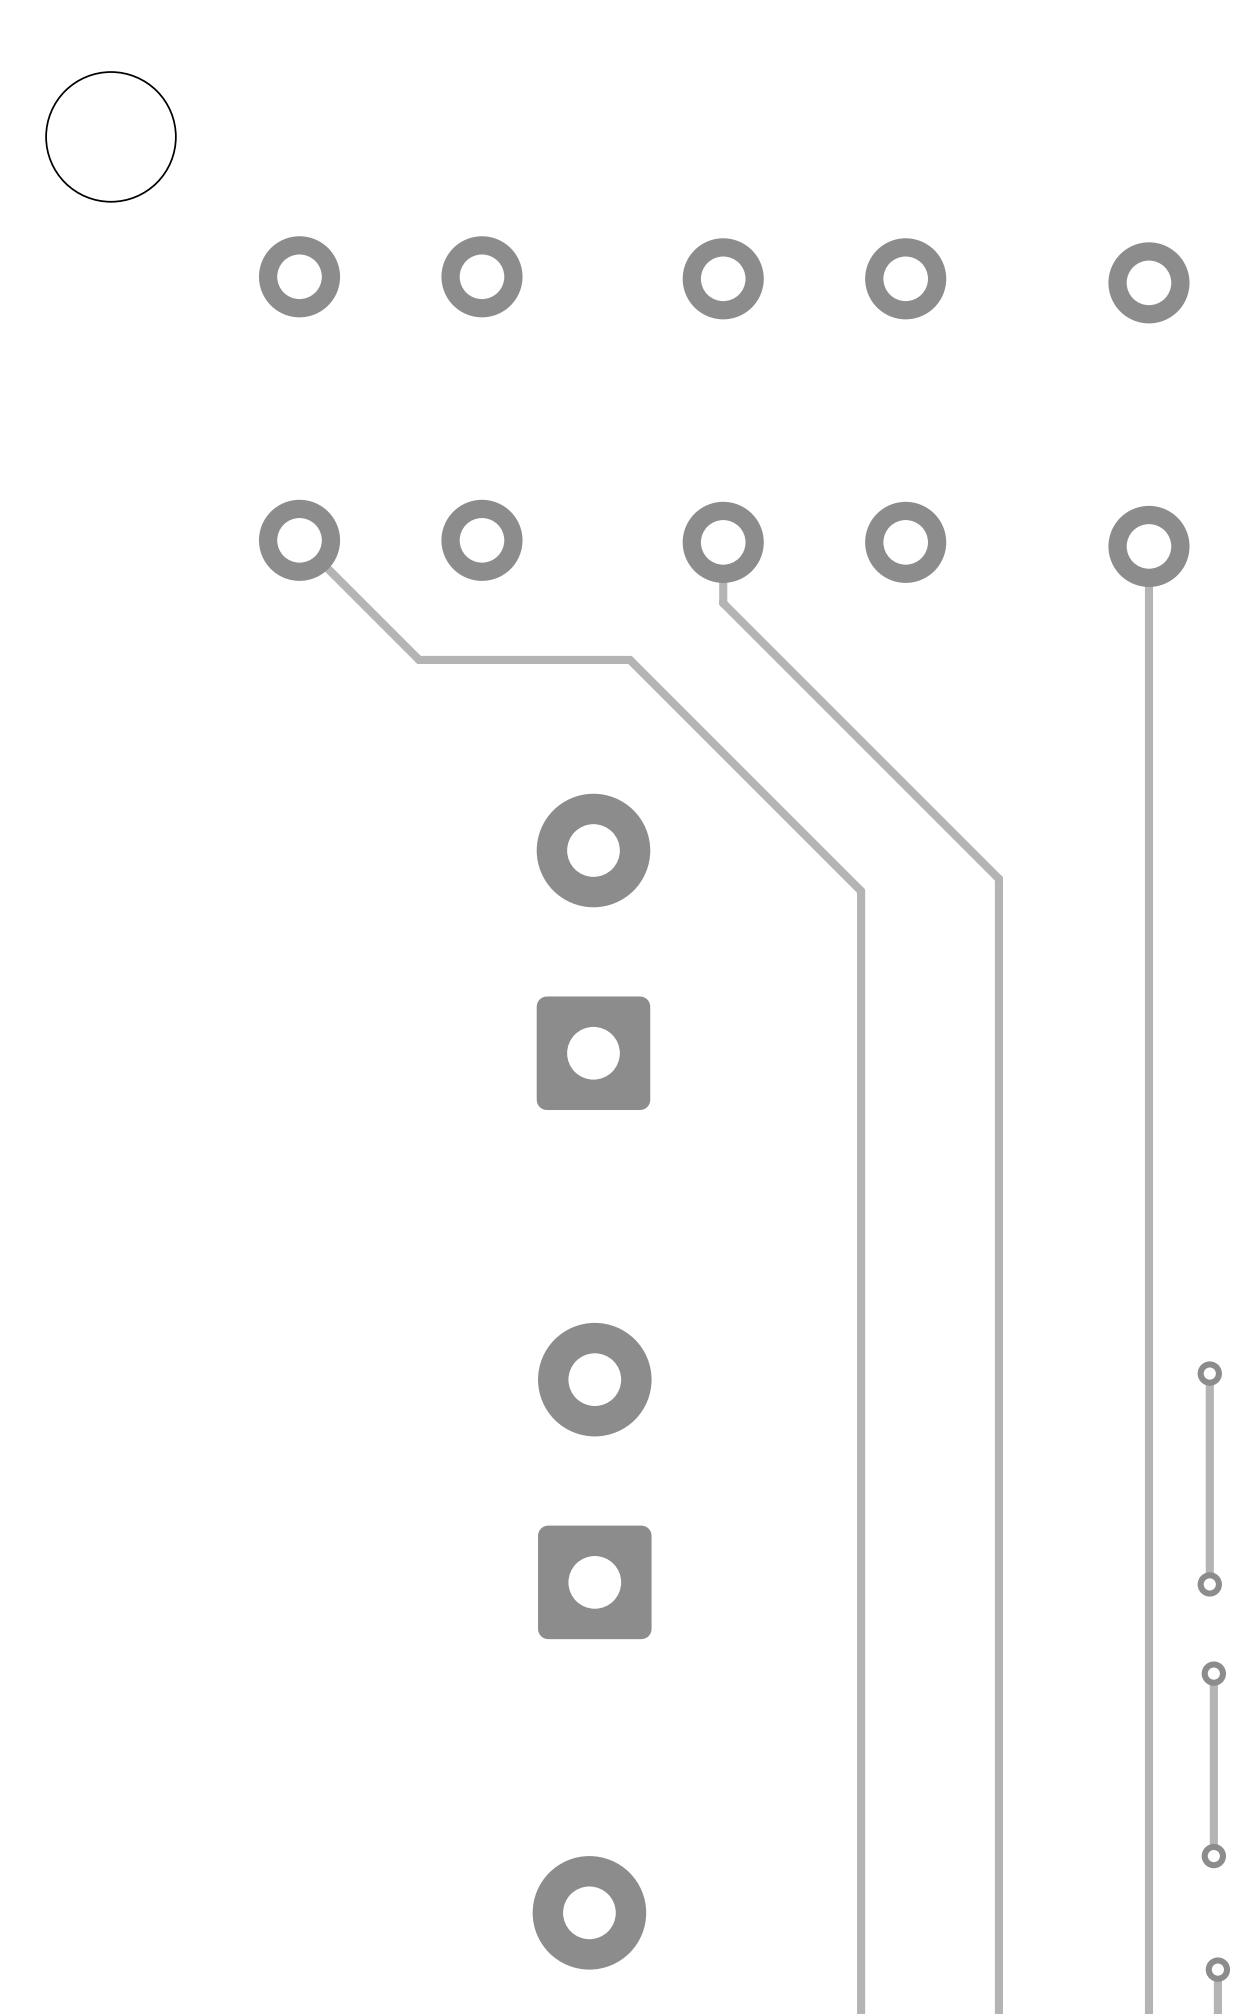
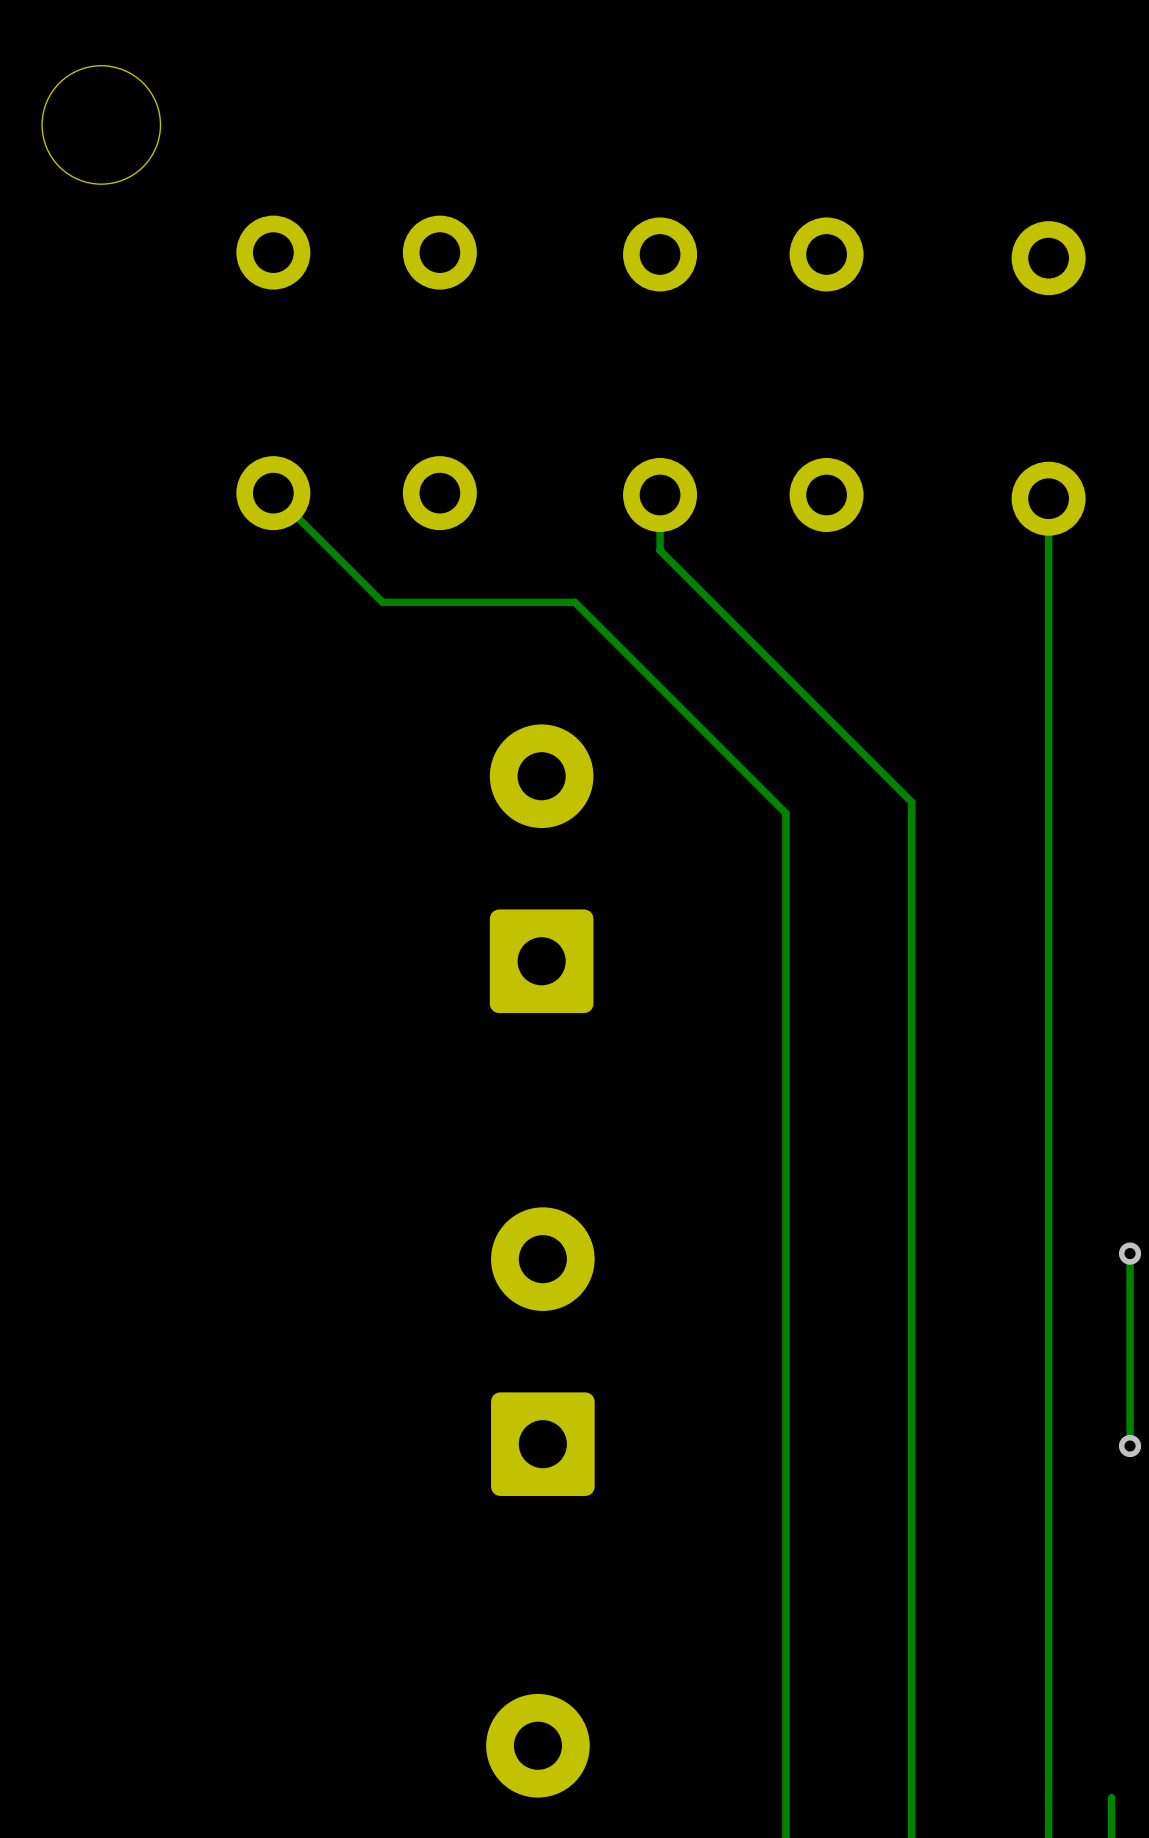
via position: (1209, 1373) -> (1130, 1253)
track: (1209, 1377) (1209, 1584) -> (1130, 1257) (1130, 1446)
via position: (1209, 1584) -> (1130, 1446)
track: (1213, 1673) (1213, 1856) -> none
via: (1213, 1673) -> none
via: (1213, 1856) -> none
via: (1217, 1969) -> none

